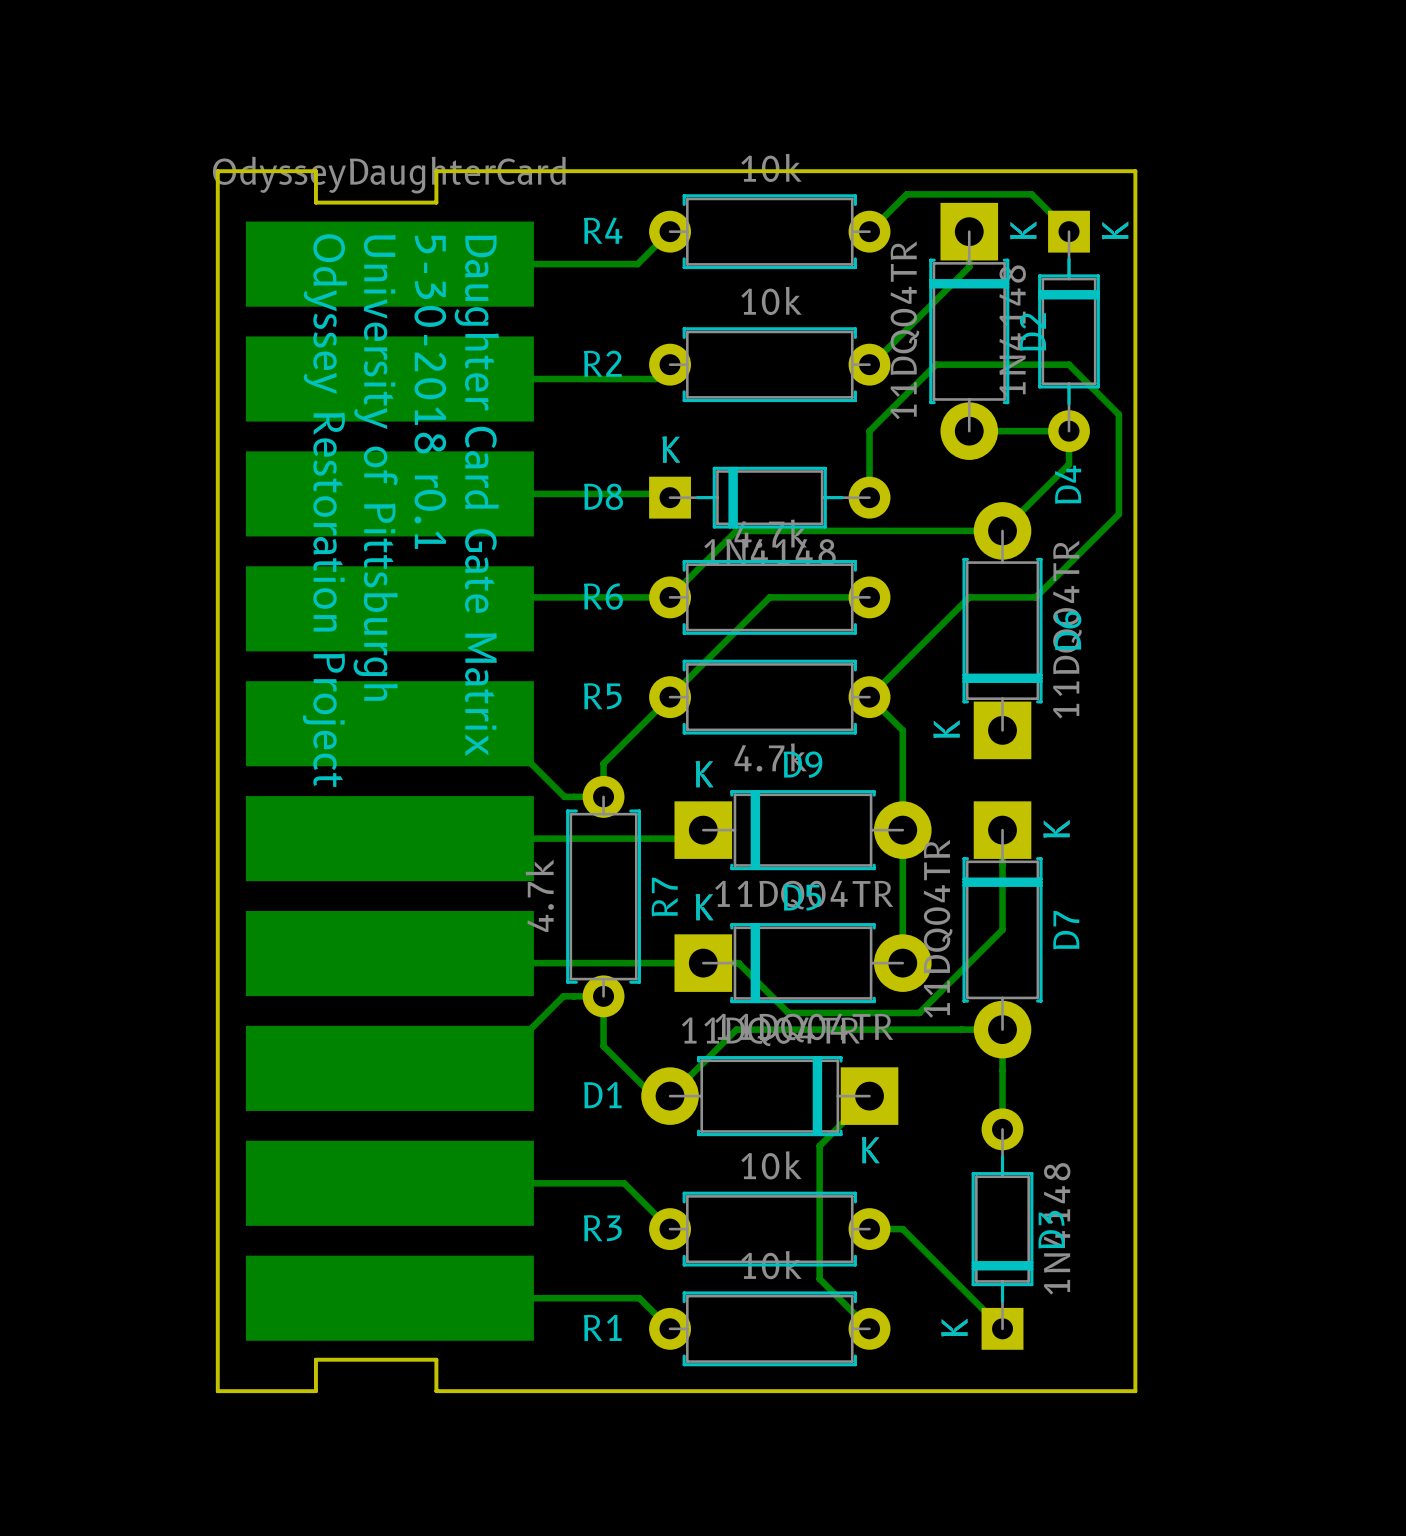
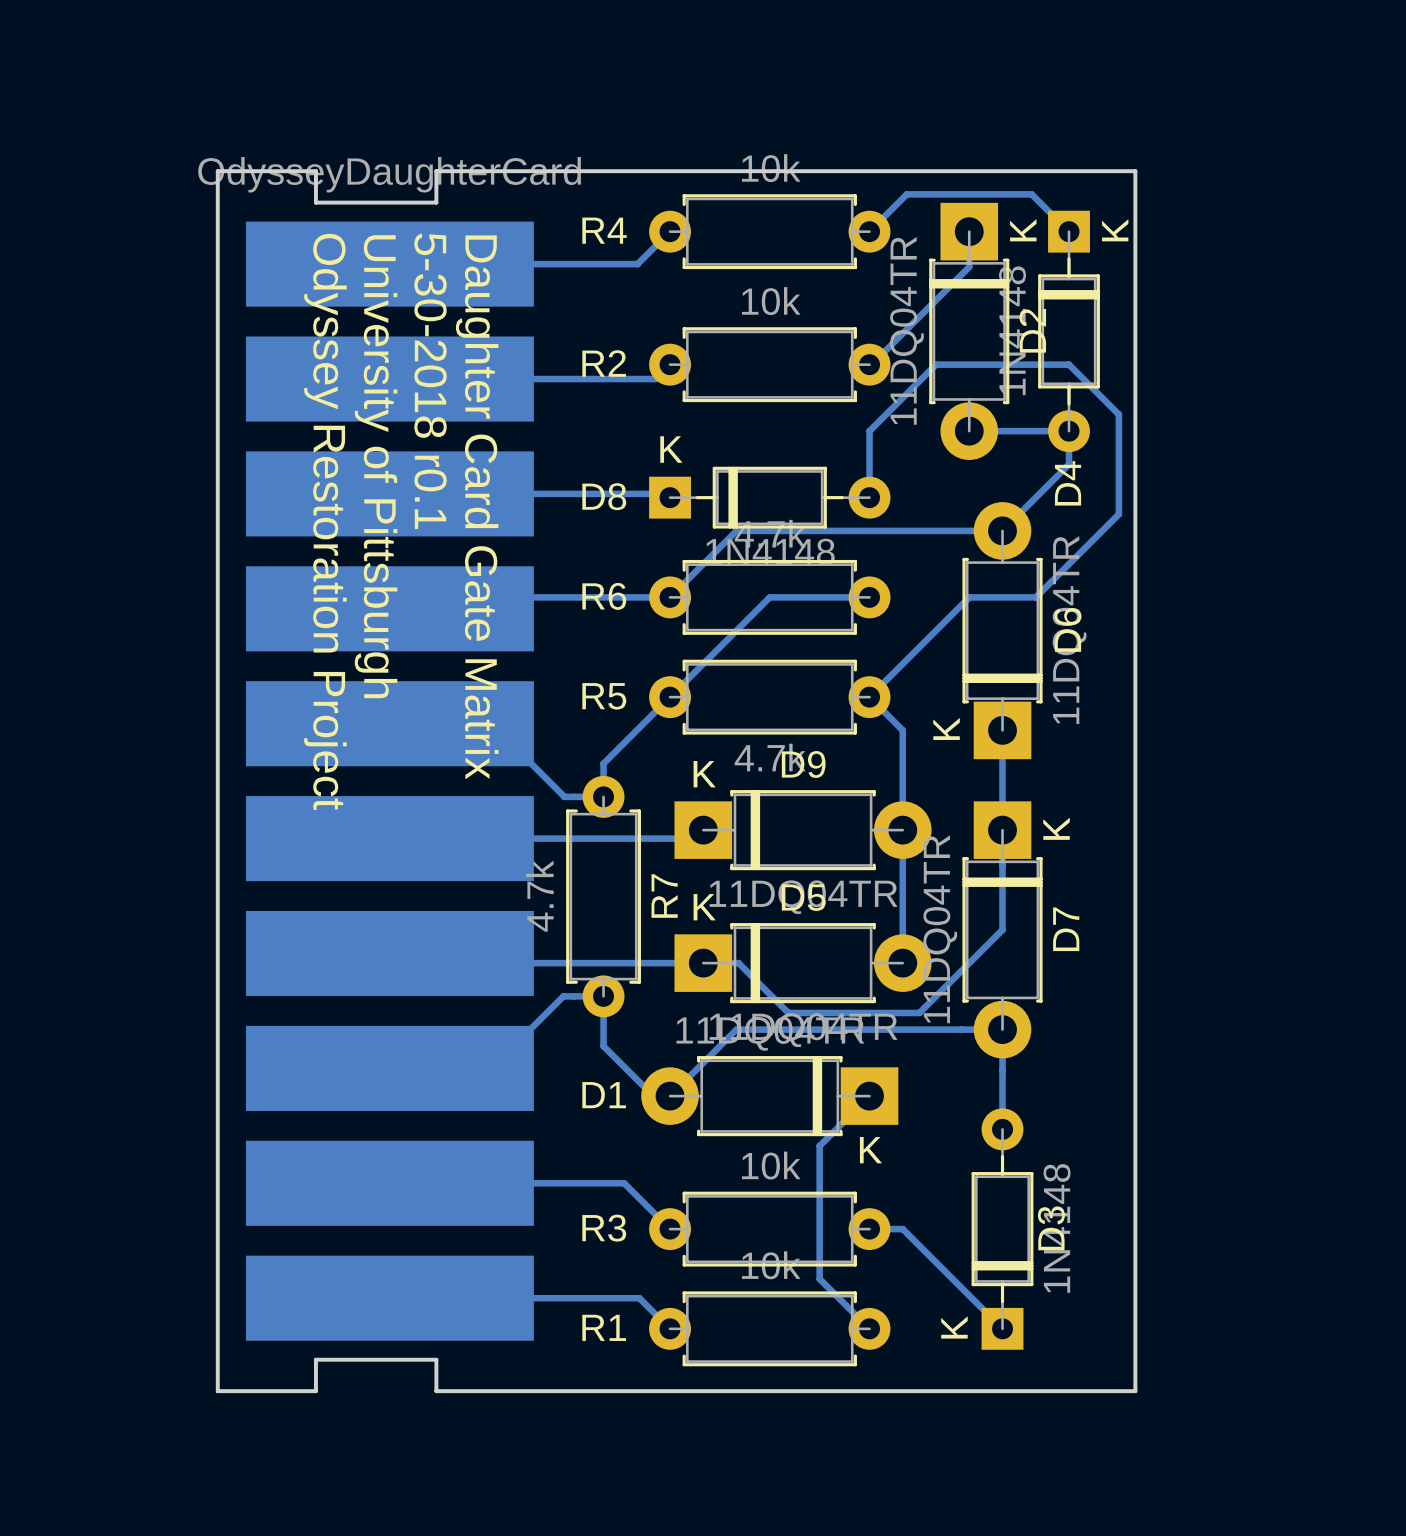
bottom track: none -> (1002, 730) (1002, 830)

